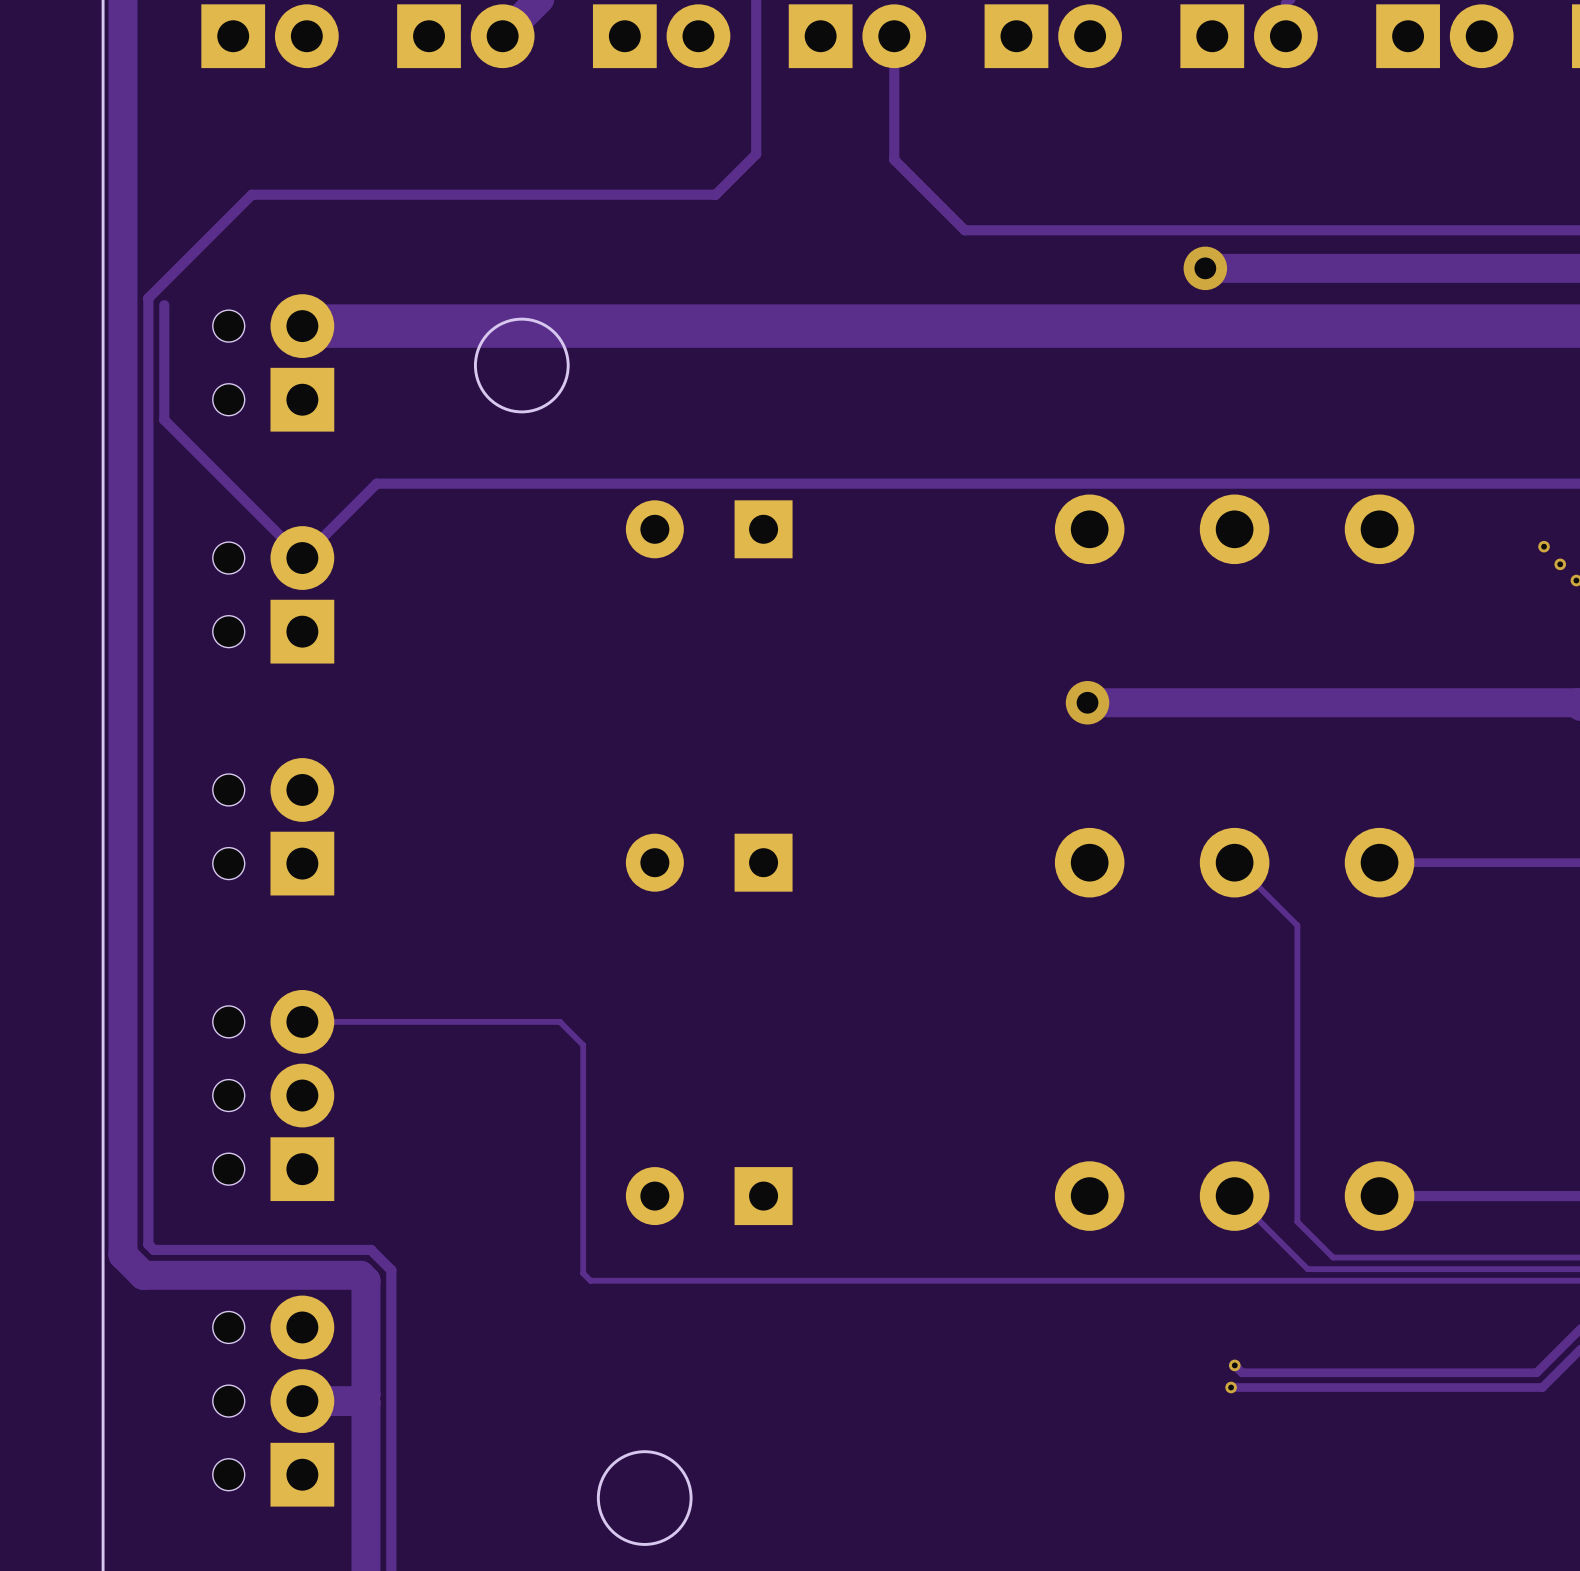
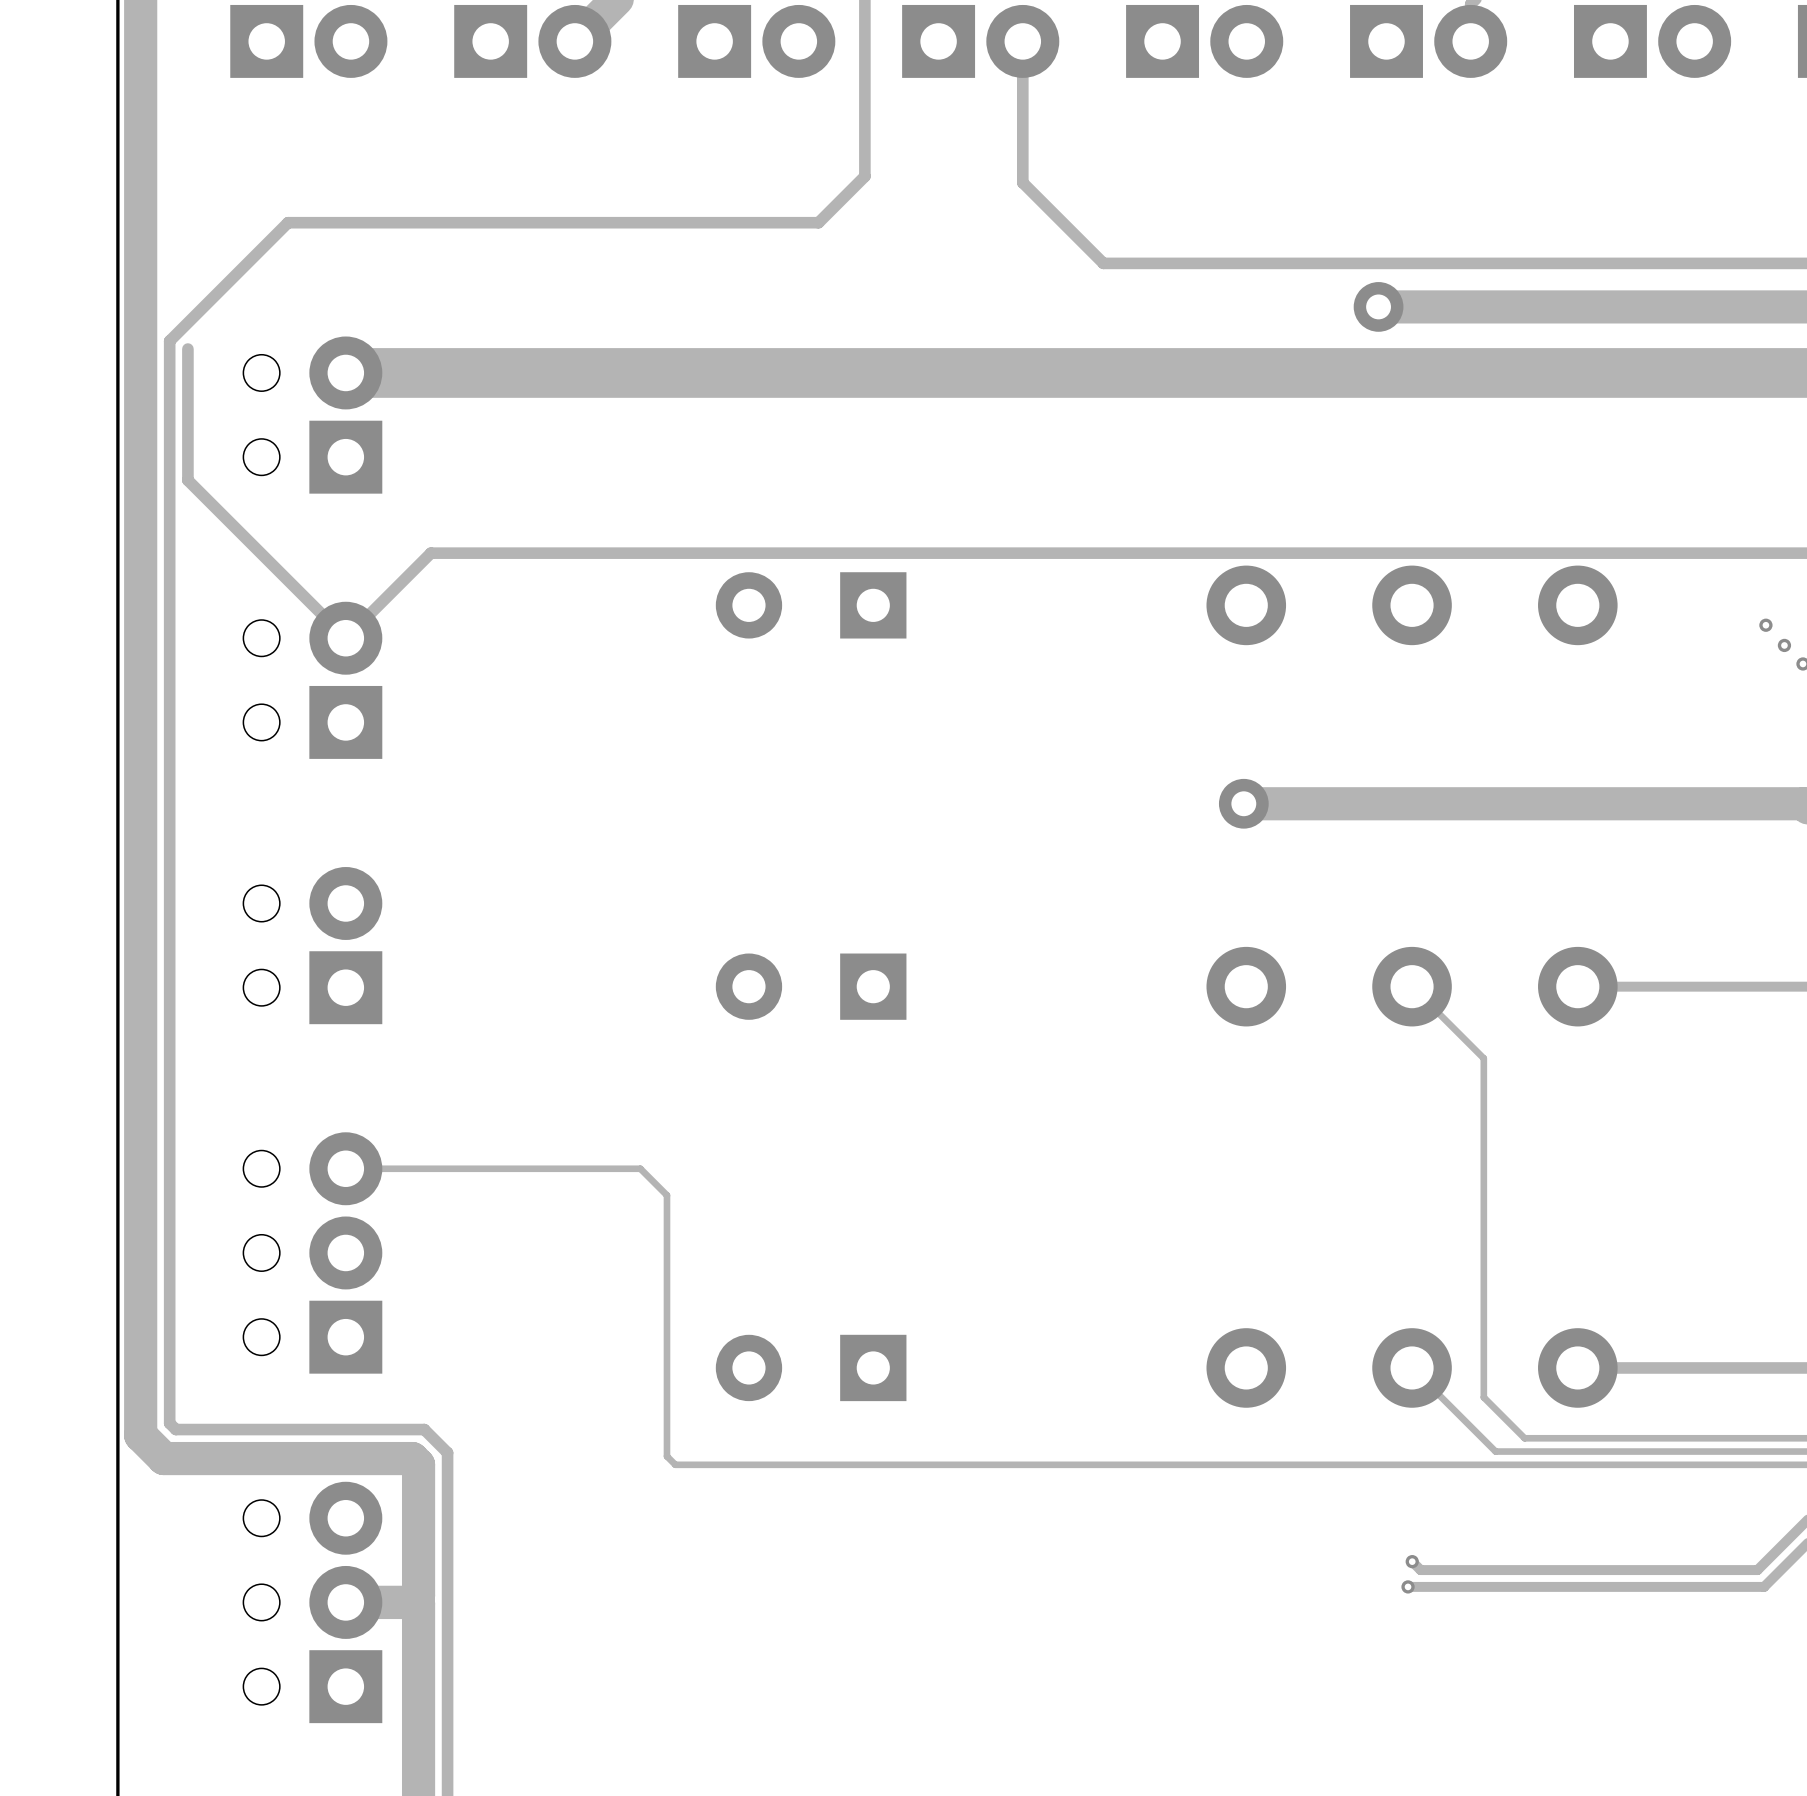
round board edge: [473, 317, 570, 414] -> none
round board edge: [596, 1450, 693, 1546] -> none

